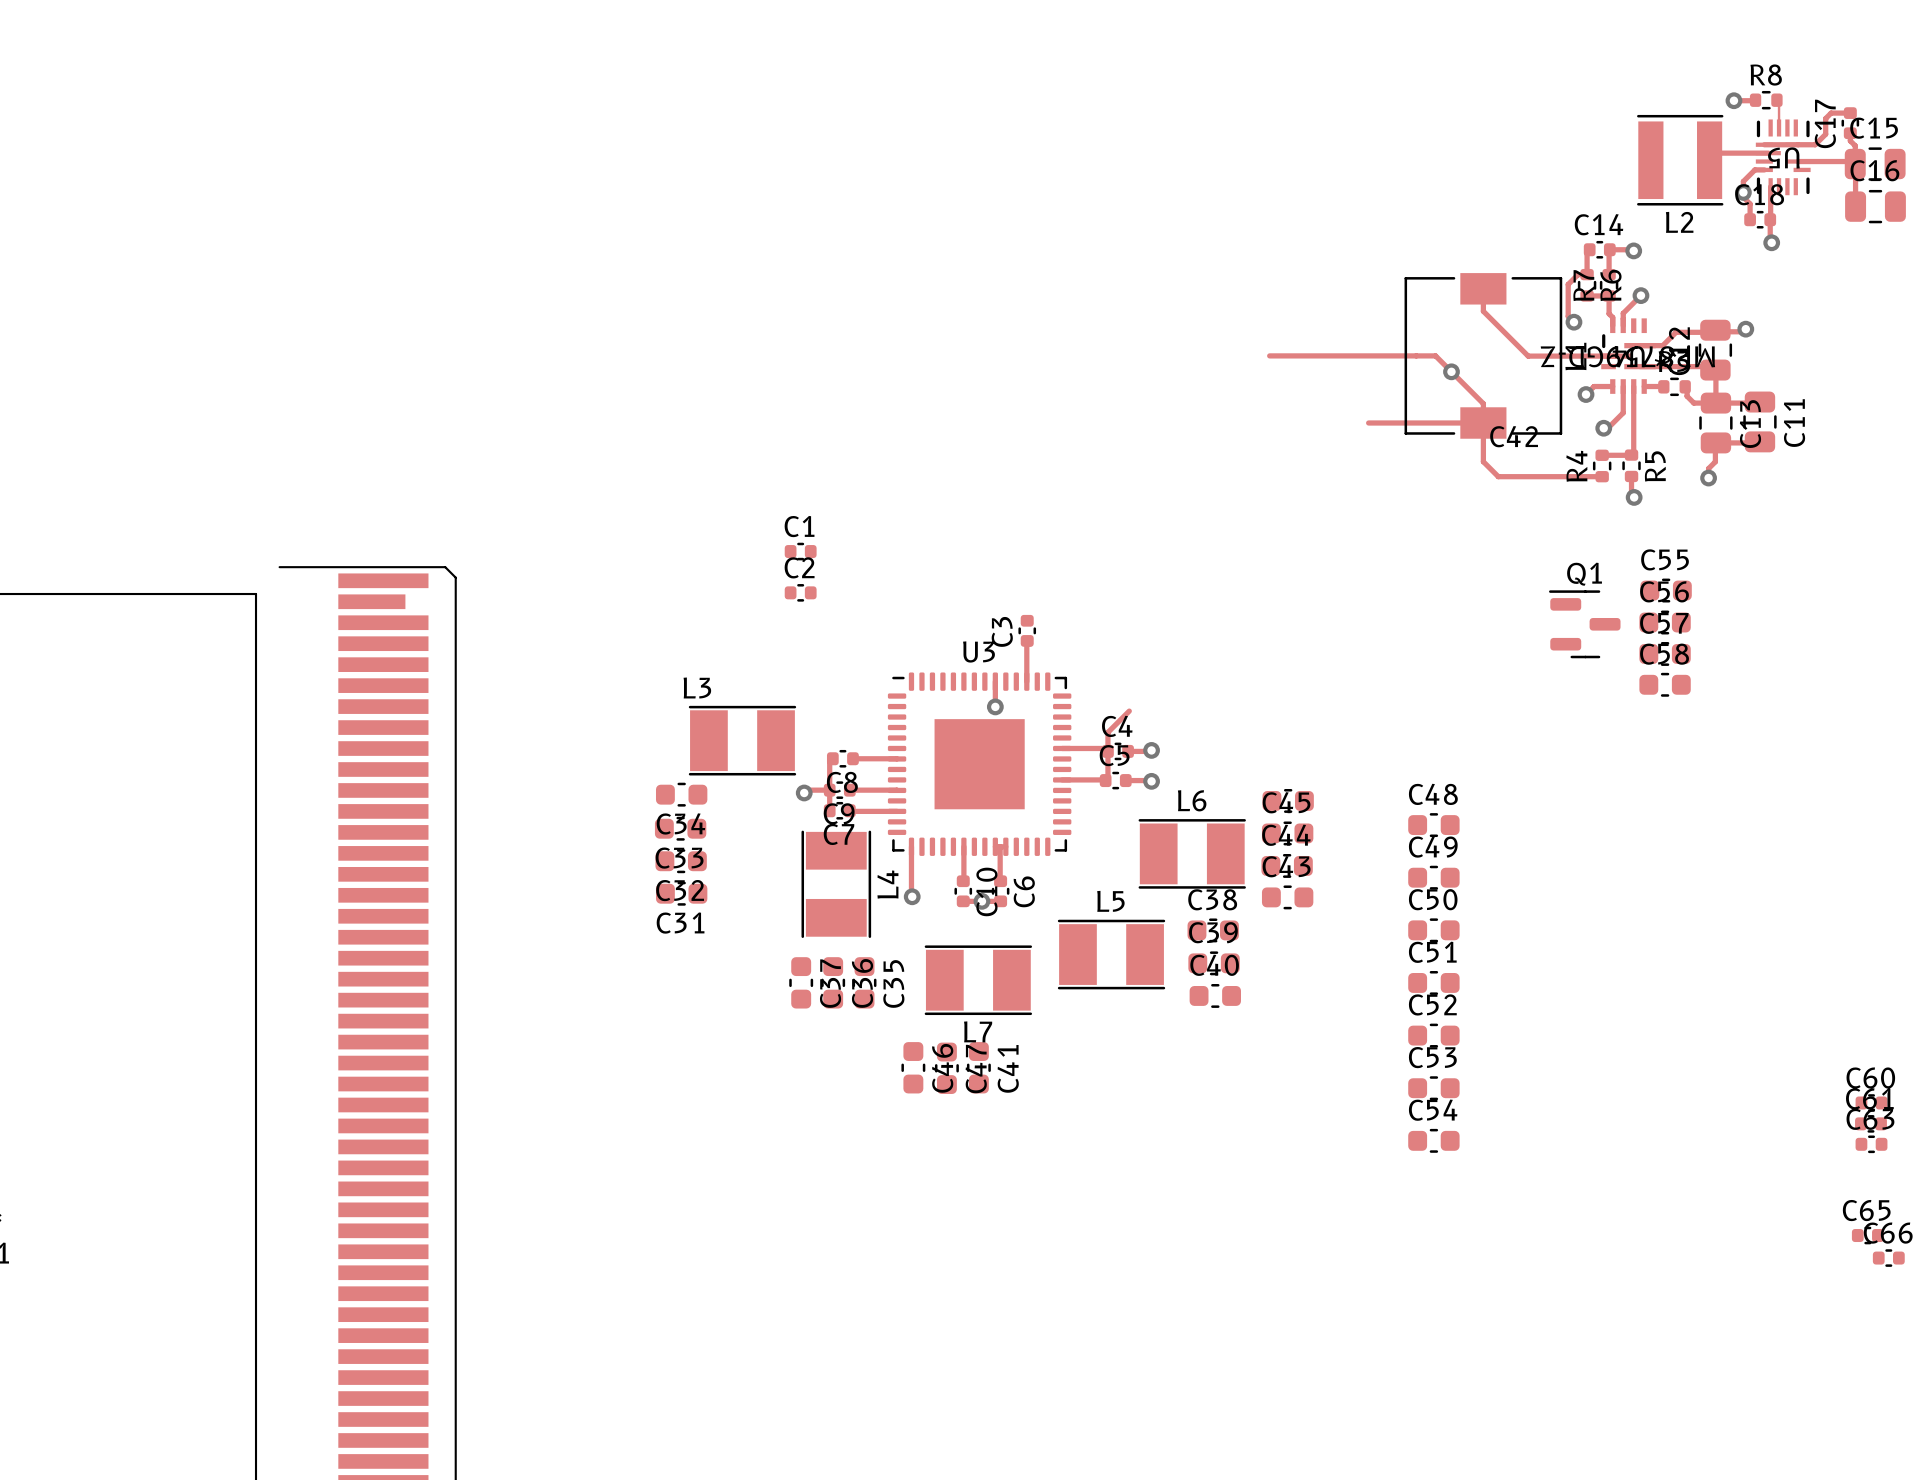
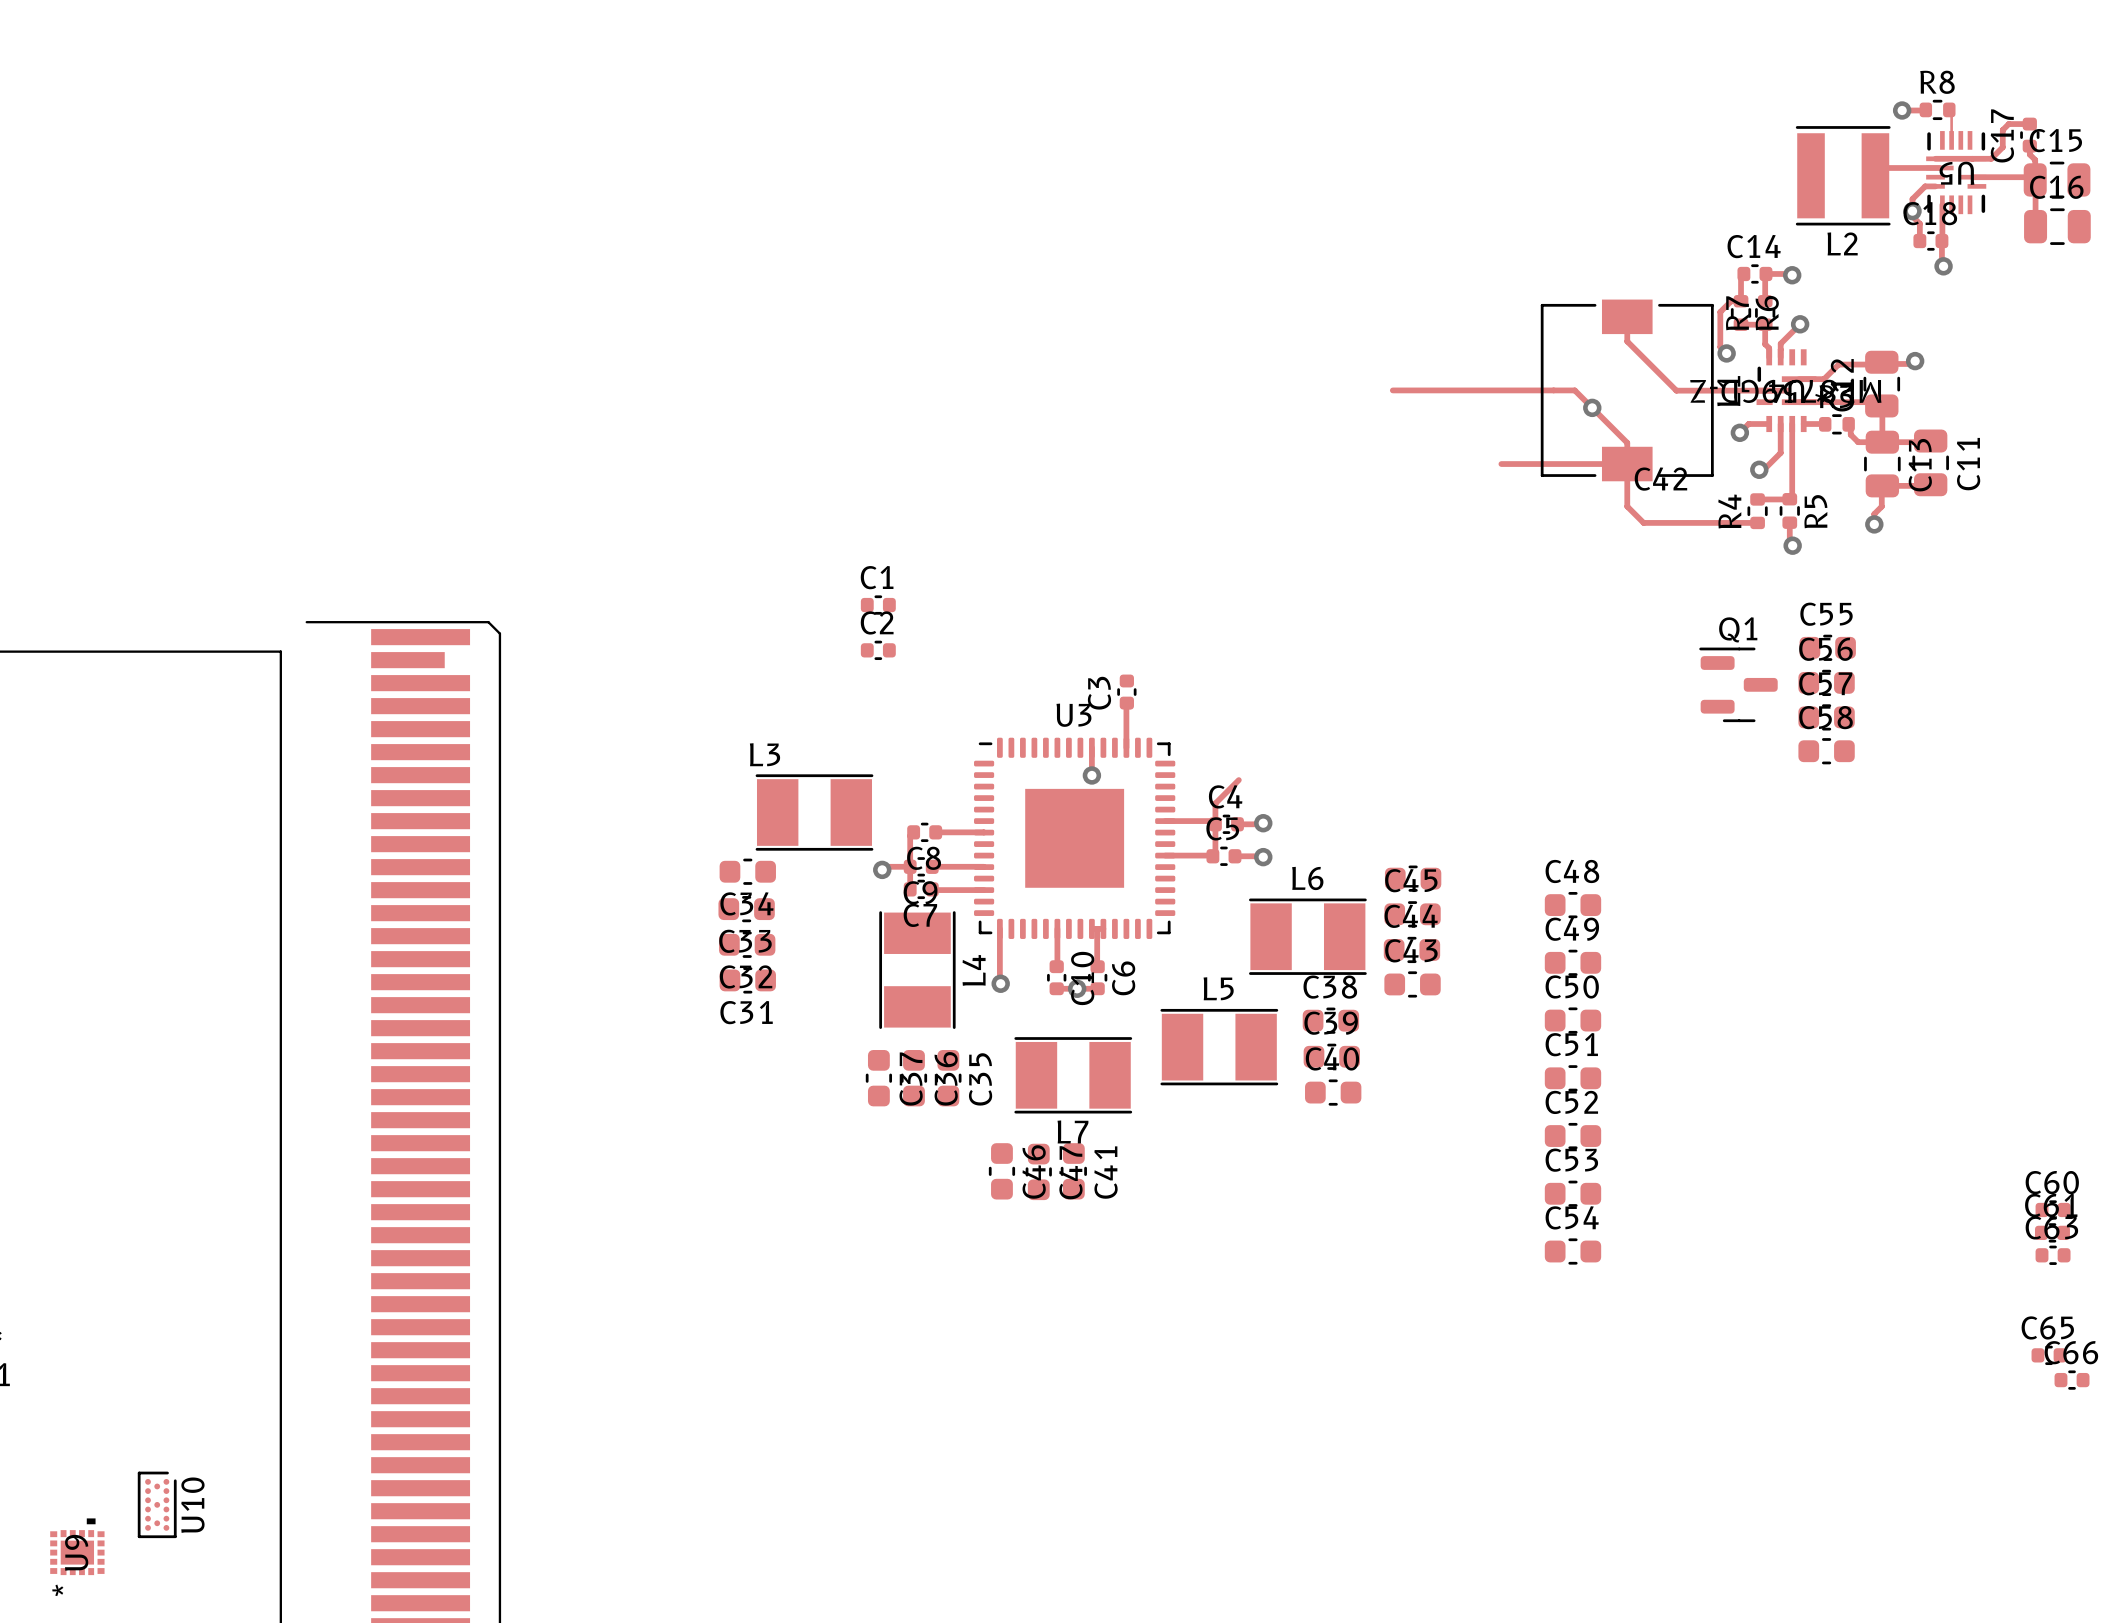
U10: none -> (157, 1504)
U9: none -> (77, 1546)

